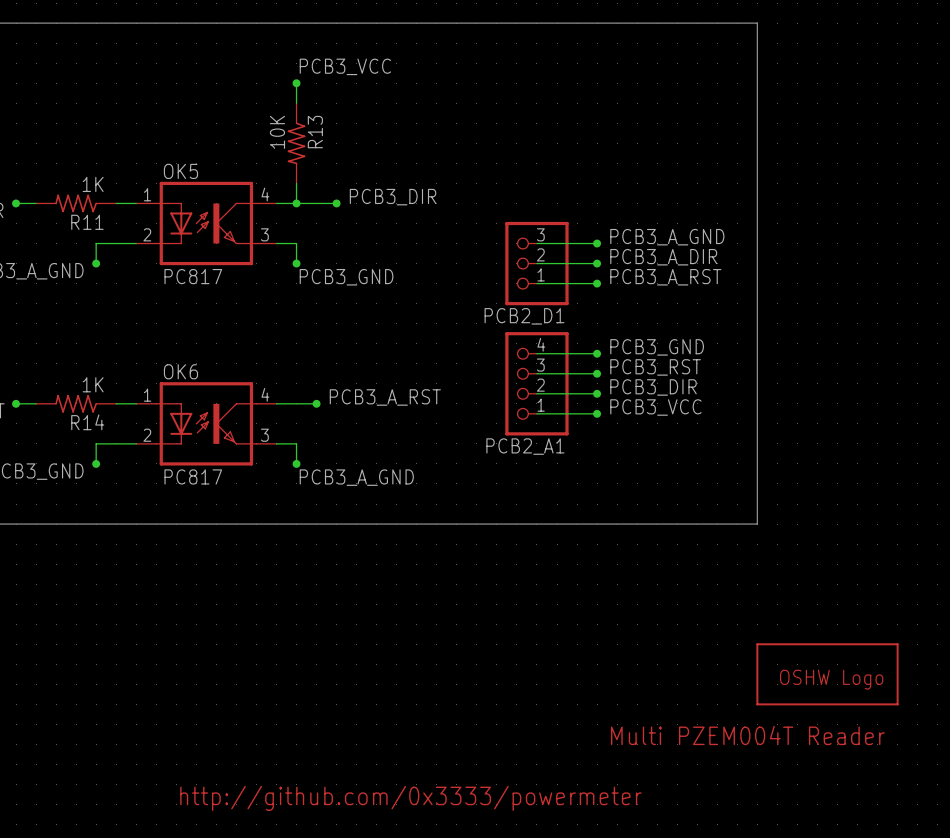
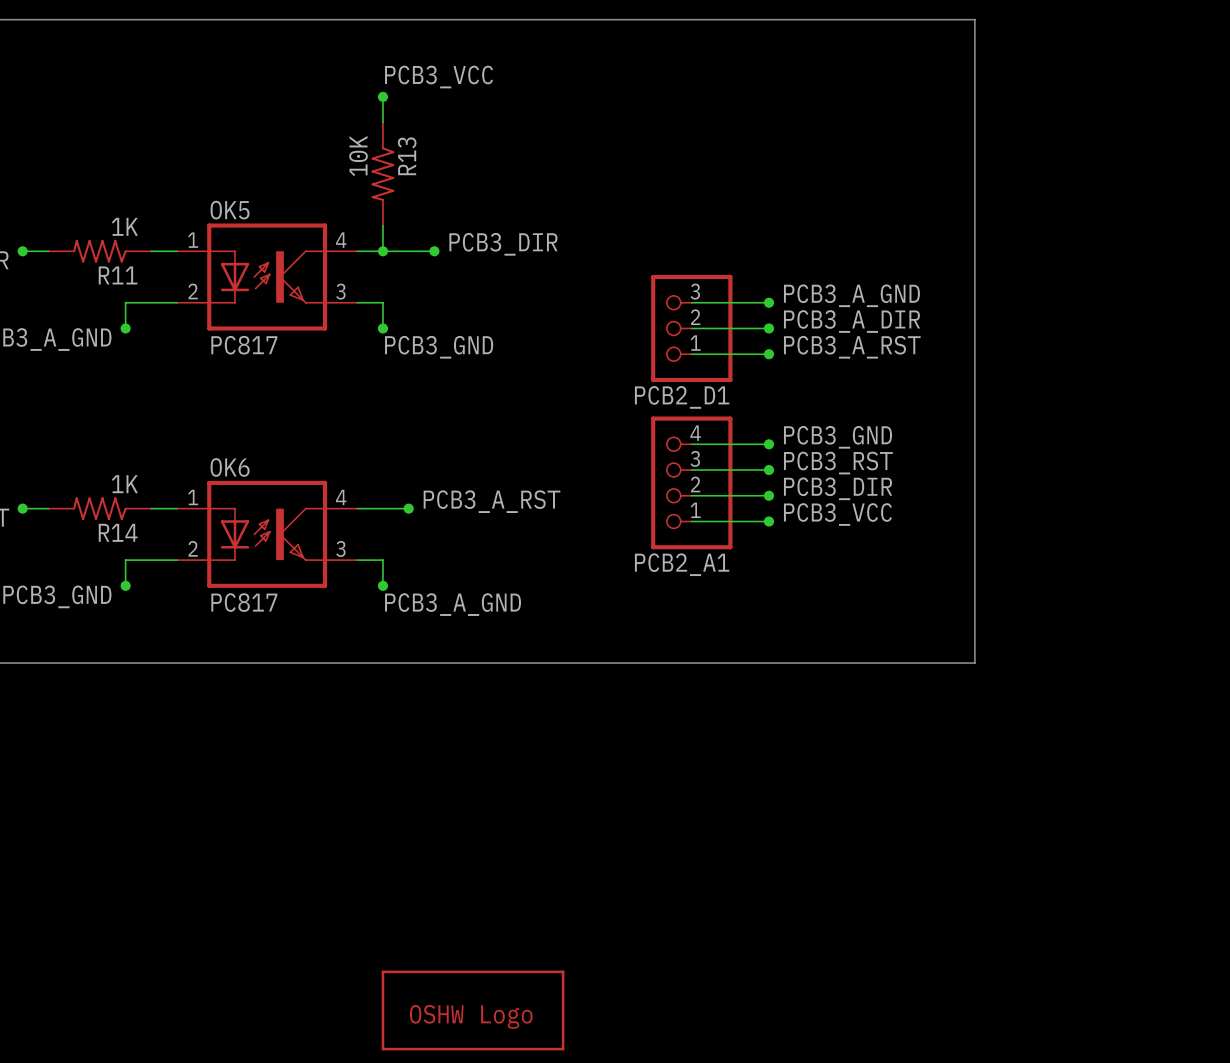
part: (827, 674) -> none
text: Multi PZEM004T Reader (747, 735) -> none
part: none -> (473, 1010)
text: http://github.com/0x3333/powermeter (410, 798) -> none

